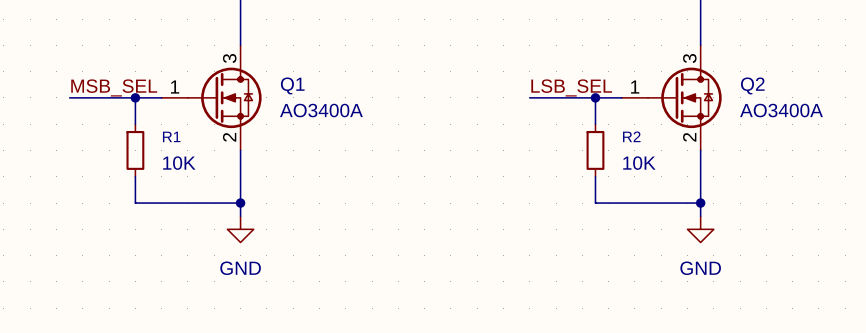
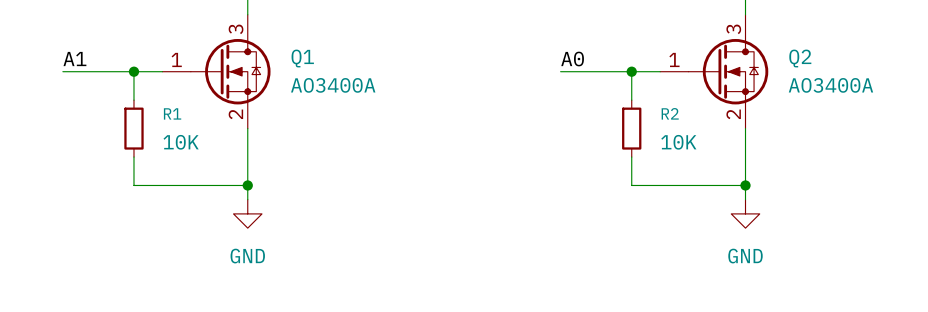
label: MSB_SEL (114, 87) -> A1 (74, 59)
label: LSB_SEL (571, 87) -> A0 (572, 59)

